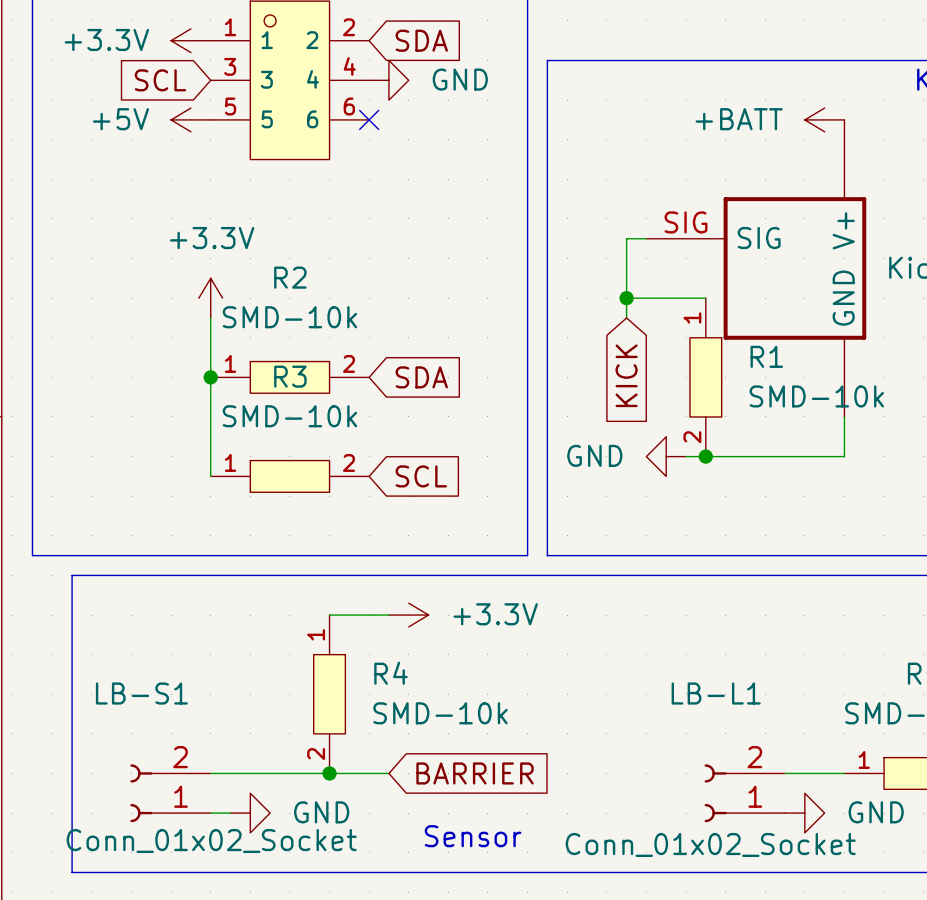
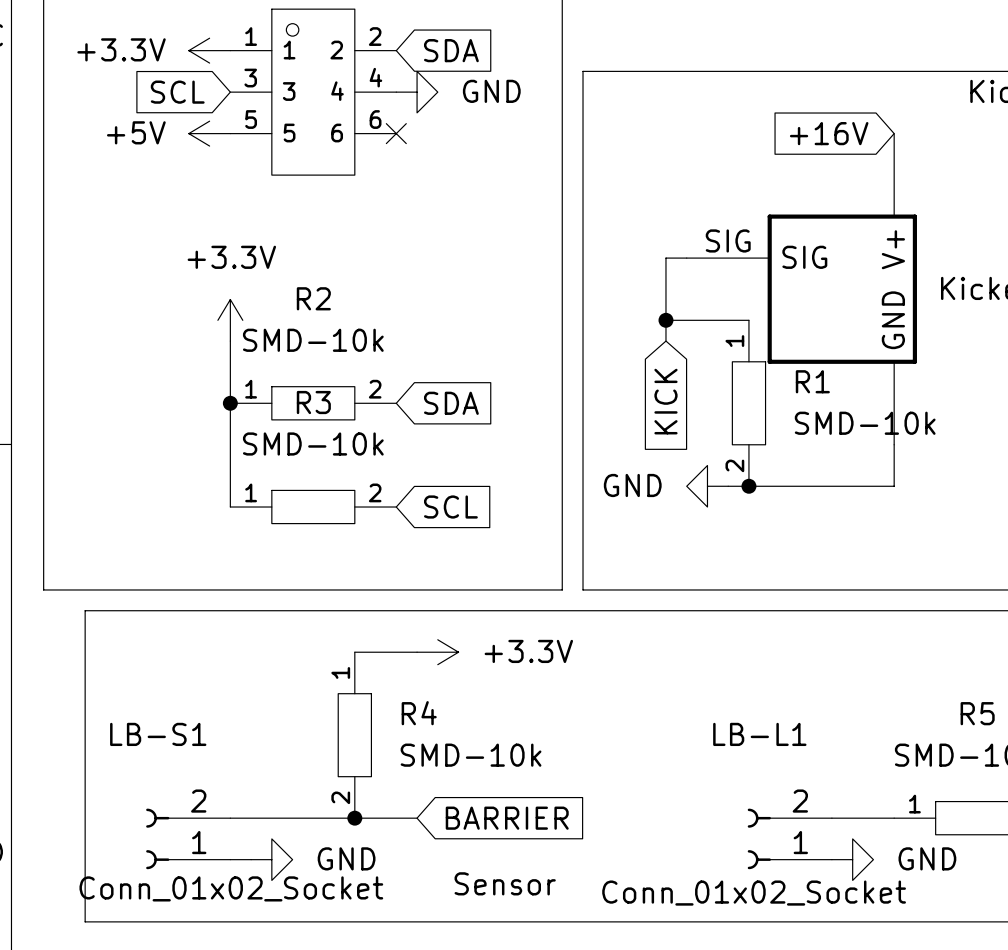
global label: none -> +16V (829, 133)
power symbol: +BATT (824, 119) -> none

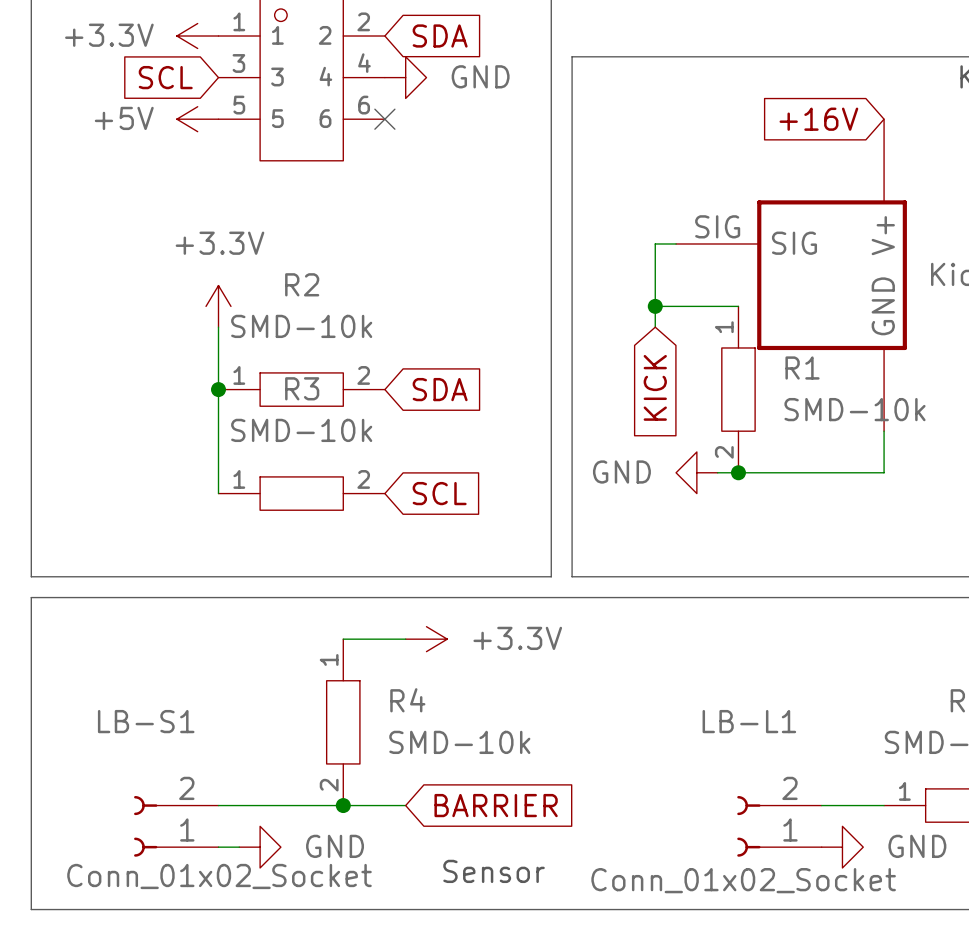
line: (85, 610) (85, 921) -> (72, 597) (31, 597) (31, 909) (72, 909)

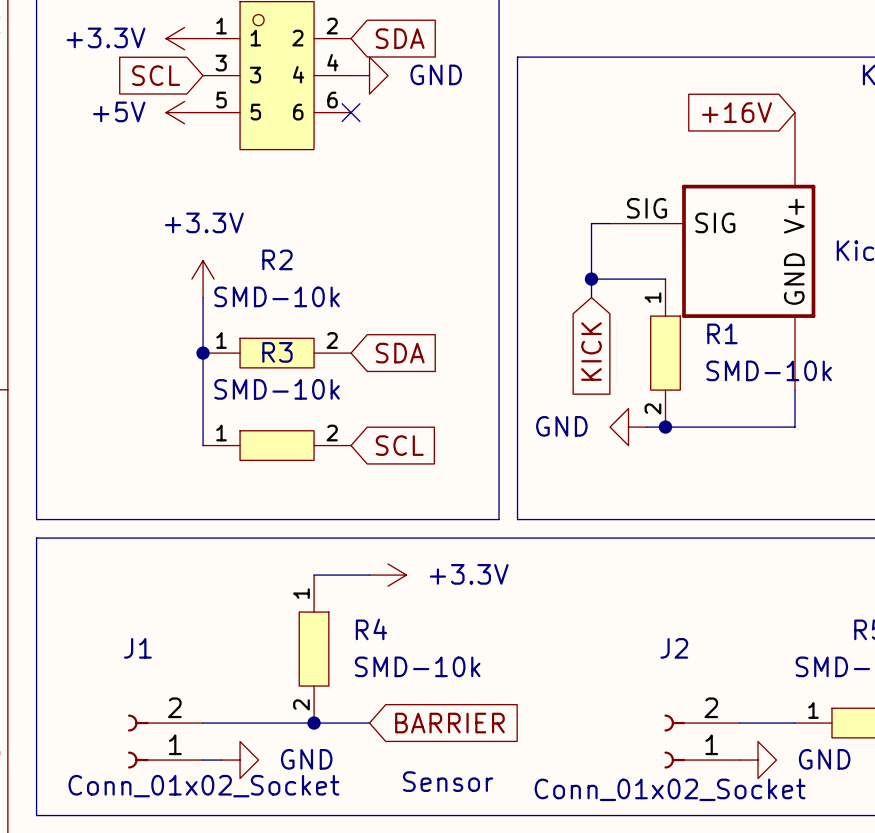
LB-S1 name: LB-S1 (146, 721) -> J1 (137, 648)
LB-L1 name: LB-L1 (749, 721) -> J2 (674, 648)

